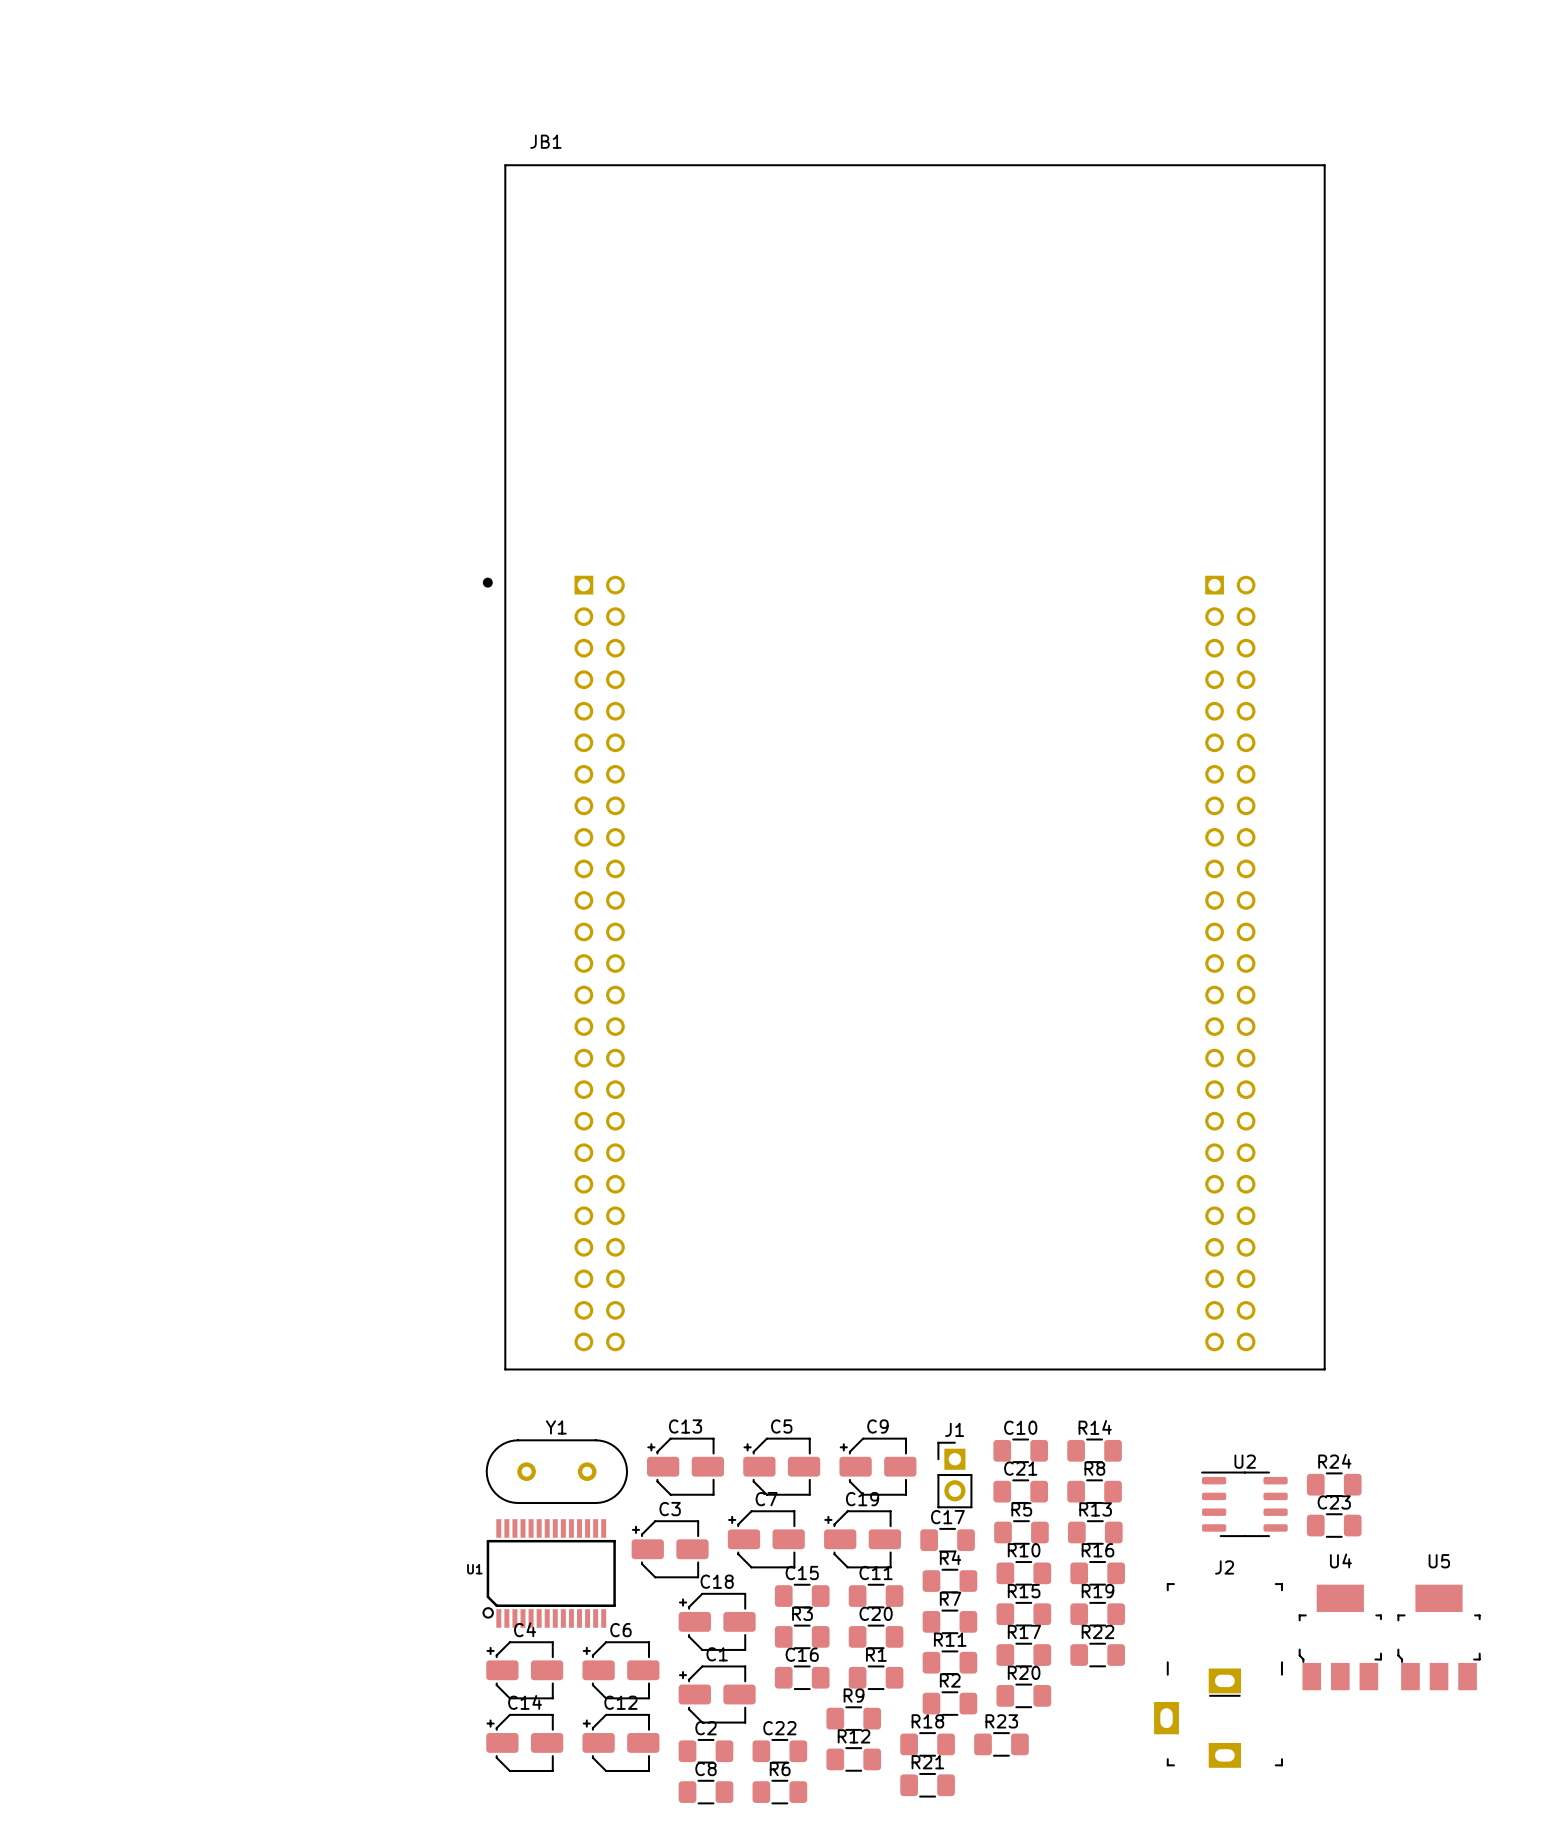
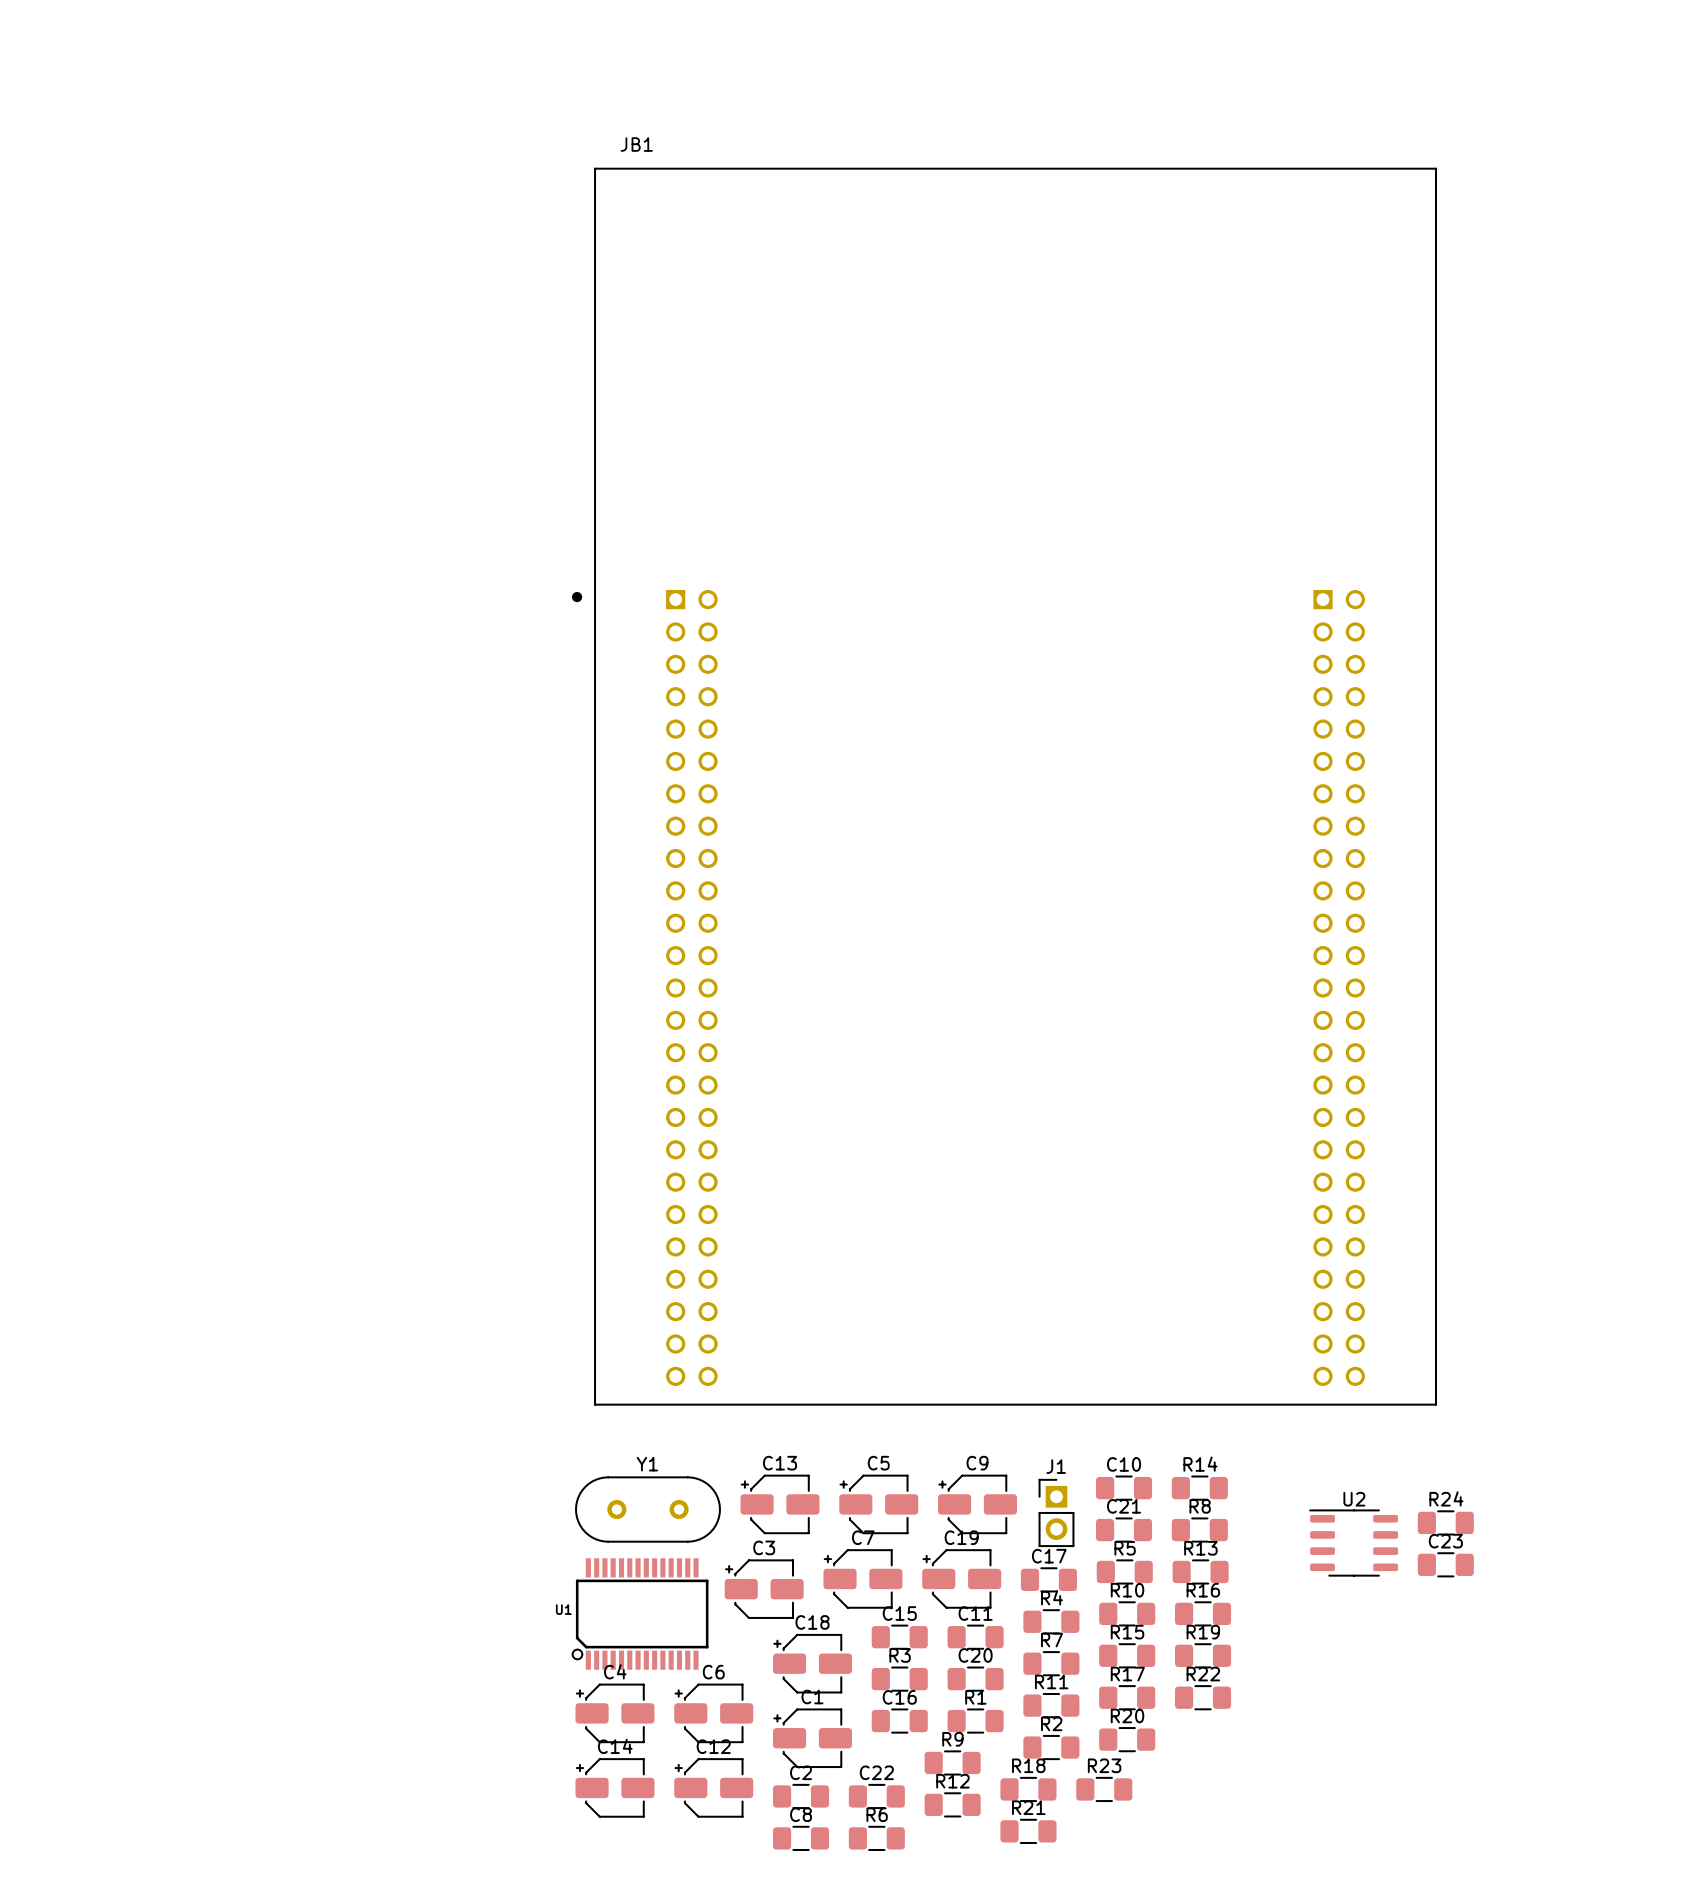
U4: (1340, 1637) -> none
U5: (1439, 1637) -> none
J2: (1218, 1675) -> none

